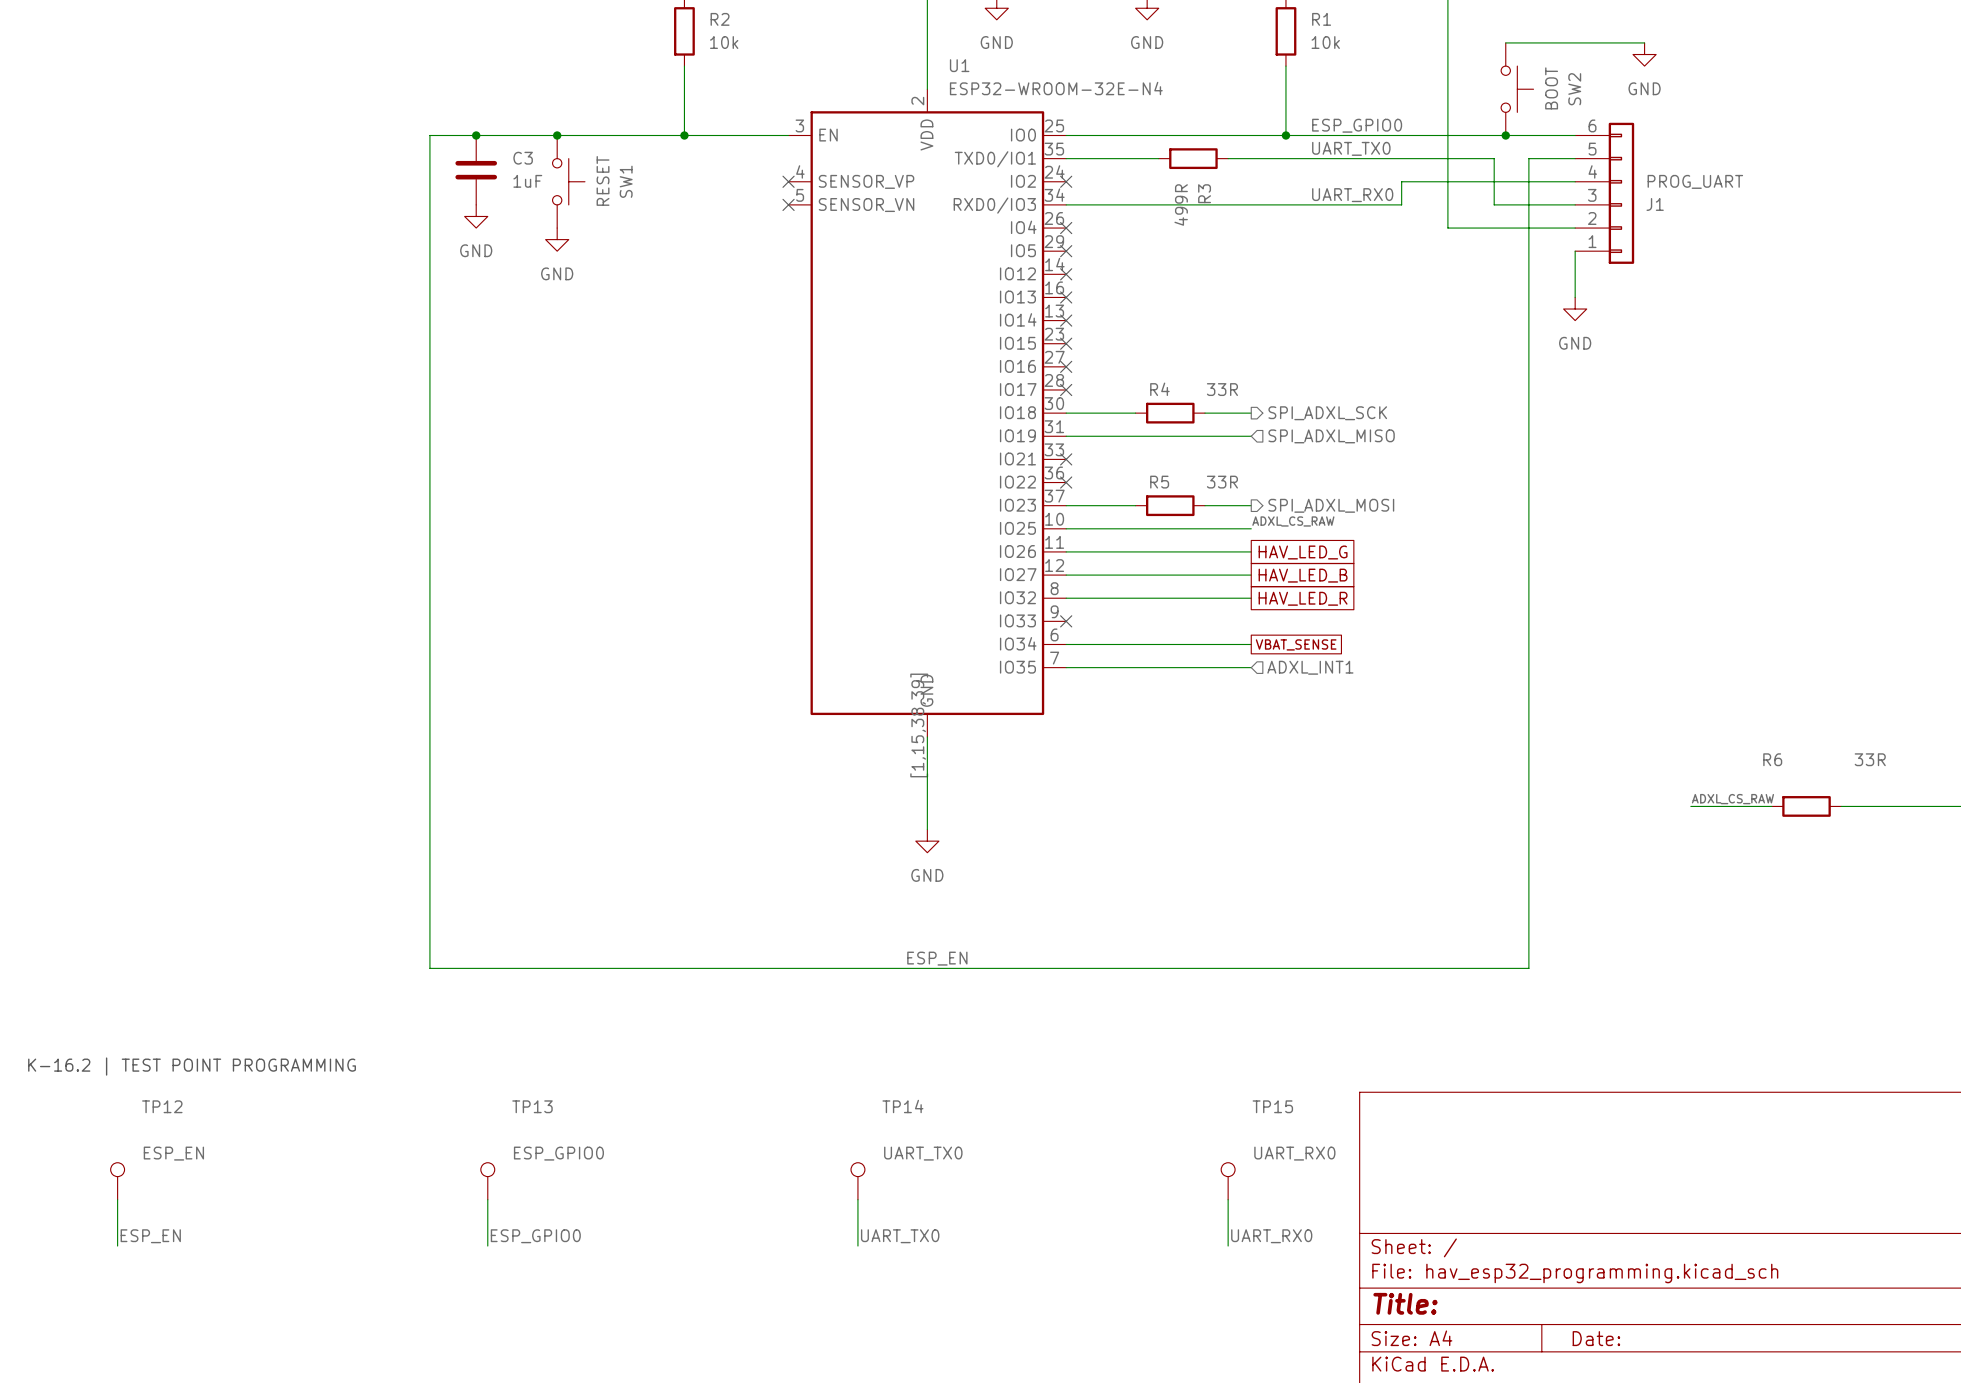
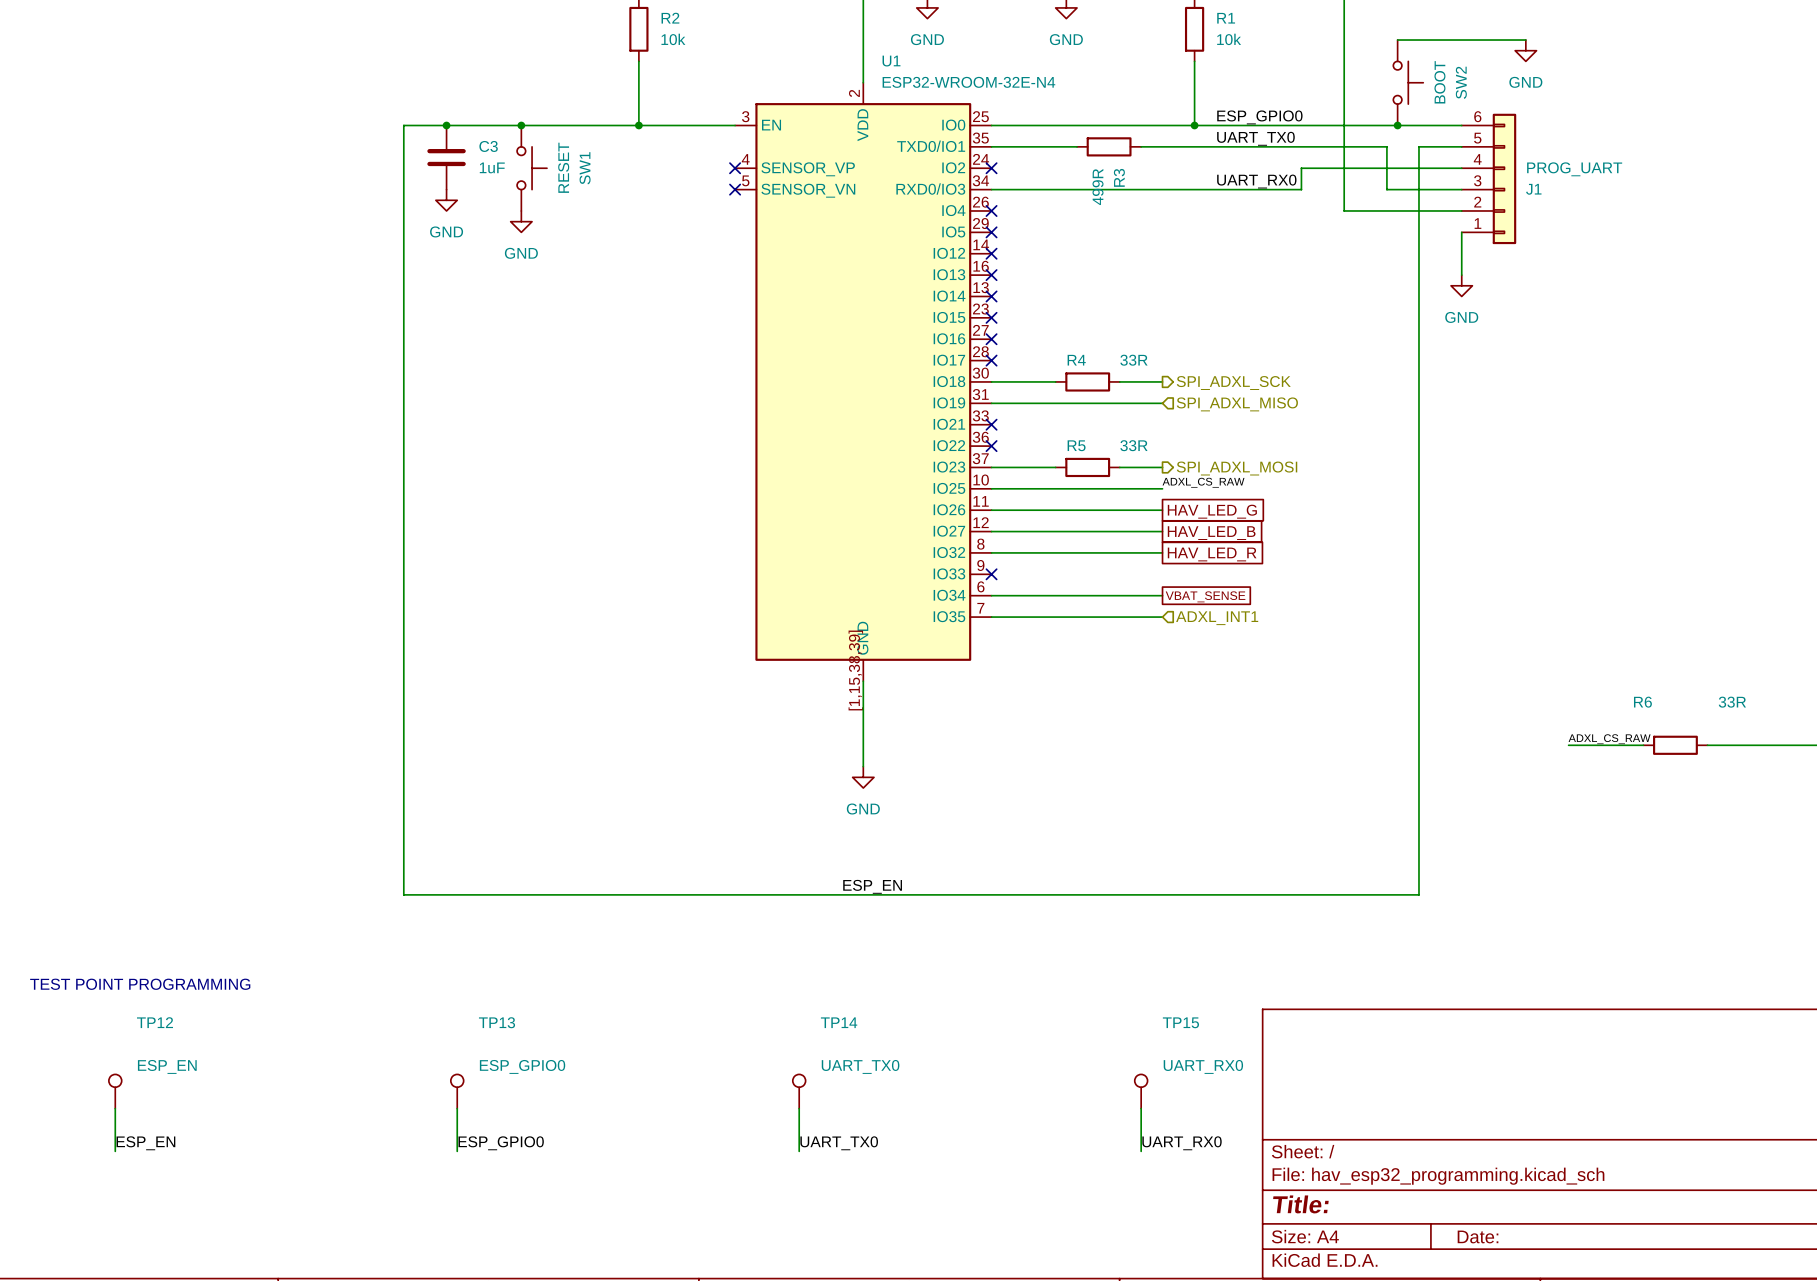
text: K-16.2 | TEST POINT PROGRAMMING (192, 1066) -> TEST POINT PROGRAMMING (140, 984)

